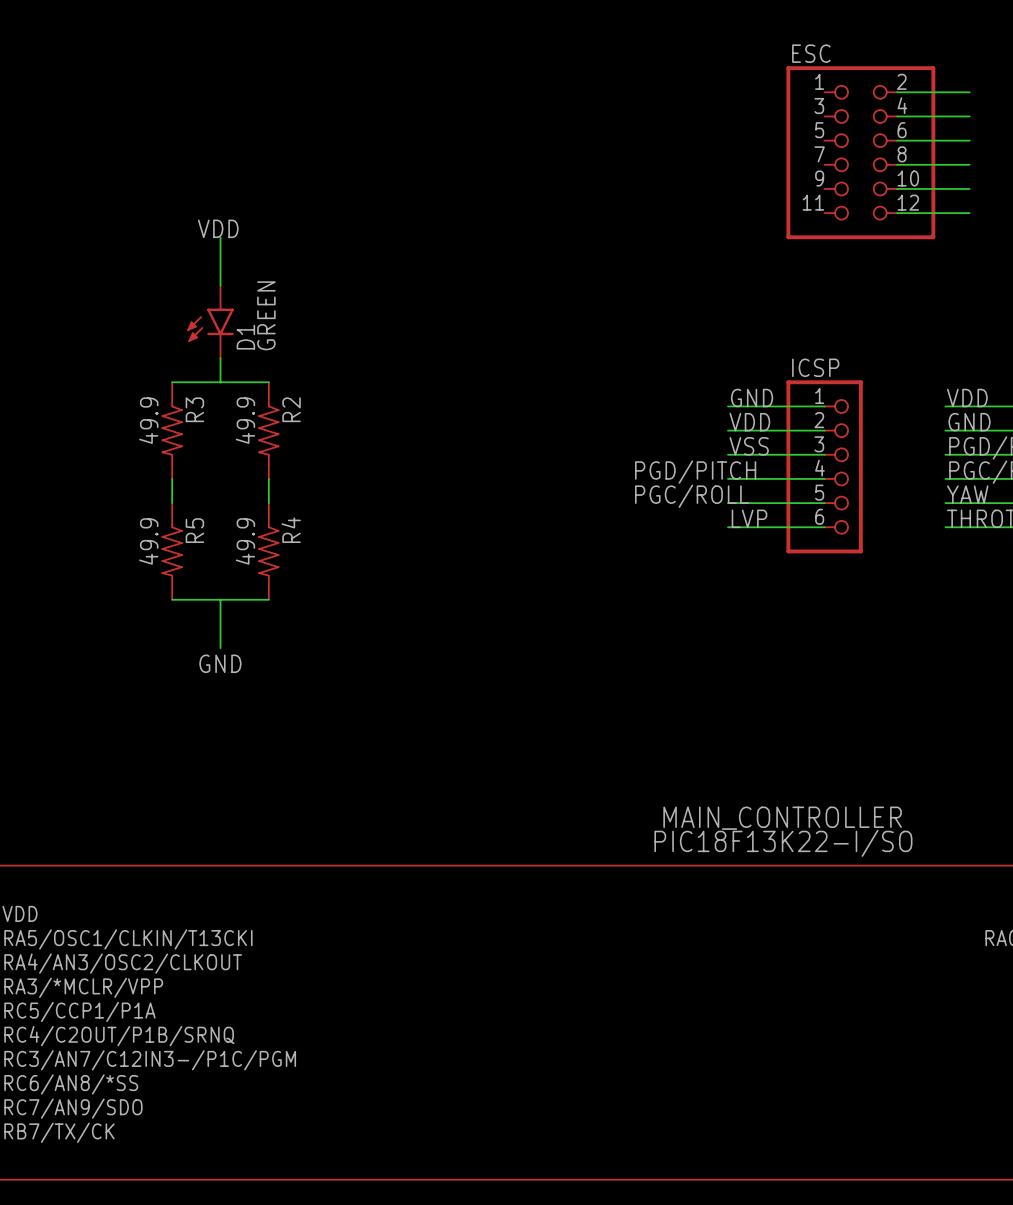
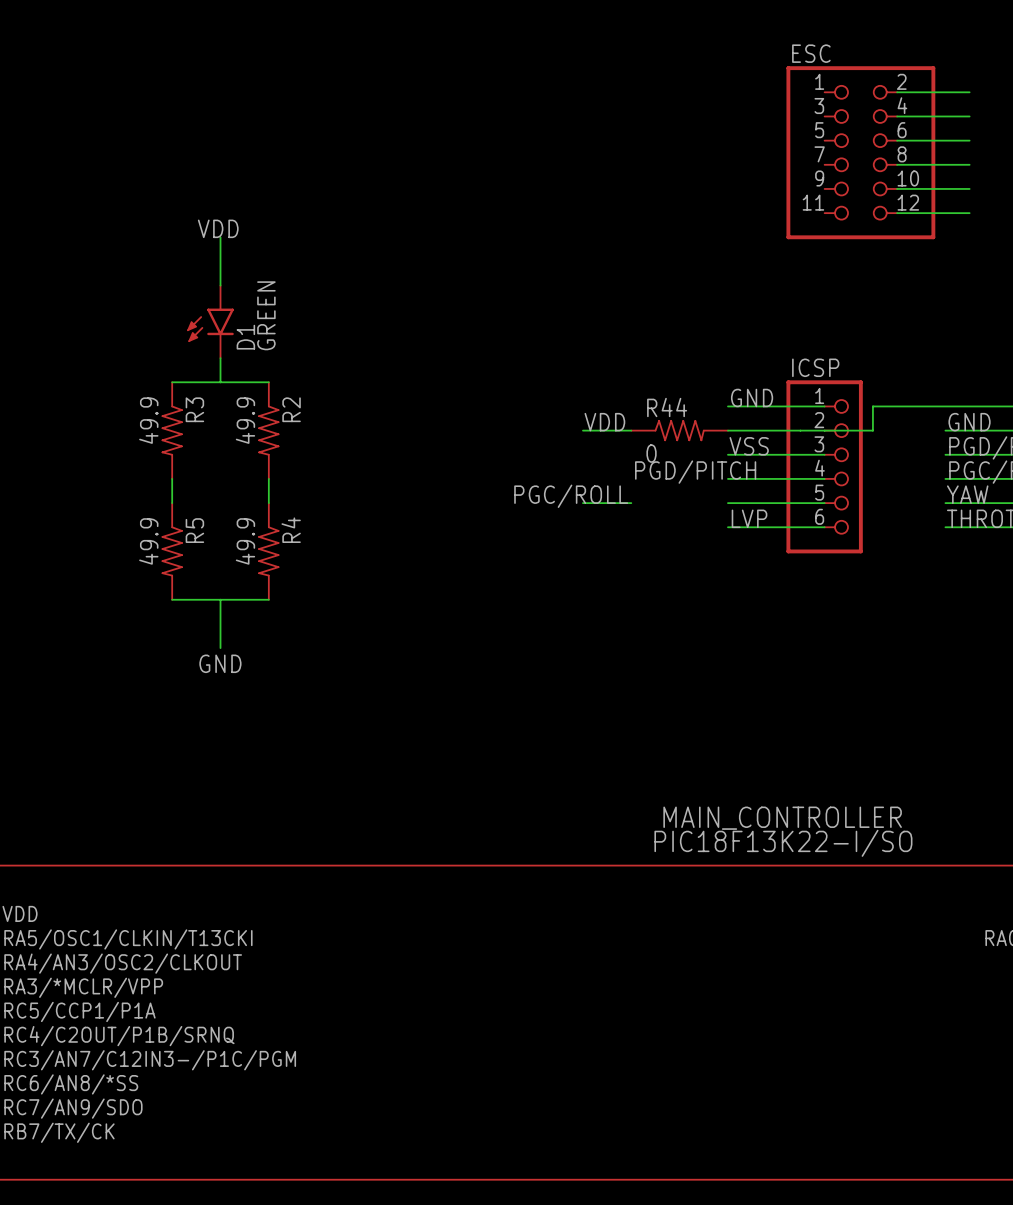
label: VDD (967, 397) -> none
wire: none -> (945, 406) (872, 406) (872, 430) (824, 430)
label position: VDD (749, 422) -> VDD (604, 422)
wire: none -> (582, 430) (631, 430)
R44: none -> 0 (679, 430)
label position: PGC/ROLL (692, 496) -> PGC/ROLL (571, 496)
wire: none -> (582, 503) (631, 503)

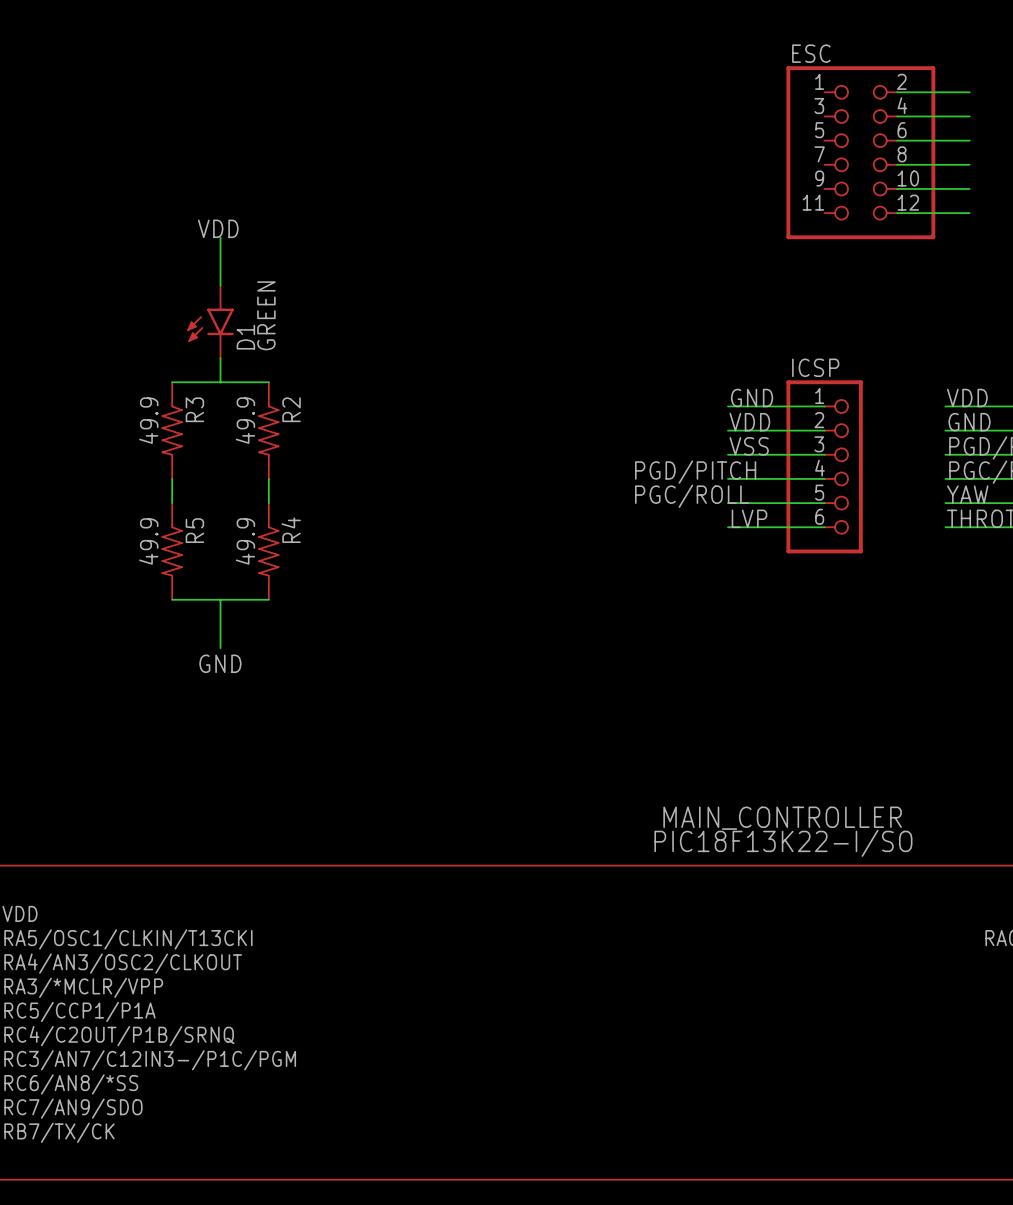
label: none -> VDD (967, 397)
wire: (945, 406) (872, 406) (872, 430) (824, 430) -> none
label position: VDD (604, 422) -> VDD (749, 422)
wire: (582, 430) (631, 430) -> none
R44: 0 (679, 430) -> none
label position: PGC/ROLL (571, 496) -> PGC/ROLL (692, 496)
wire: (582, 503) (631, 503) -> none

